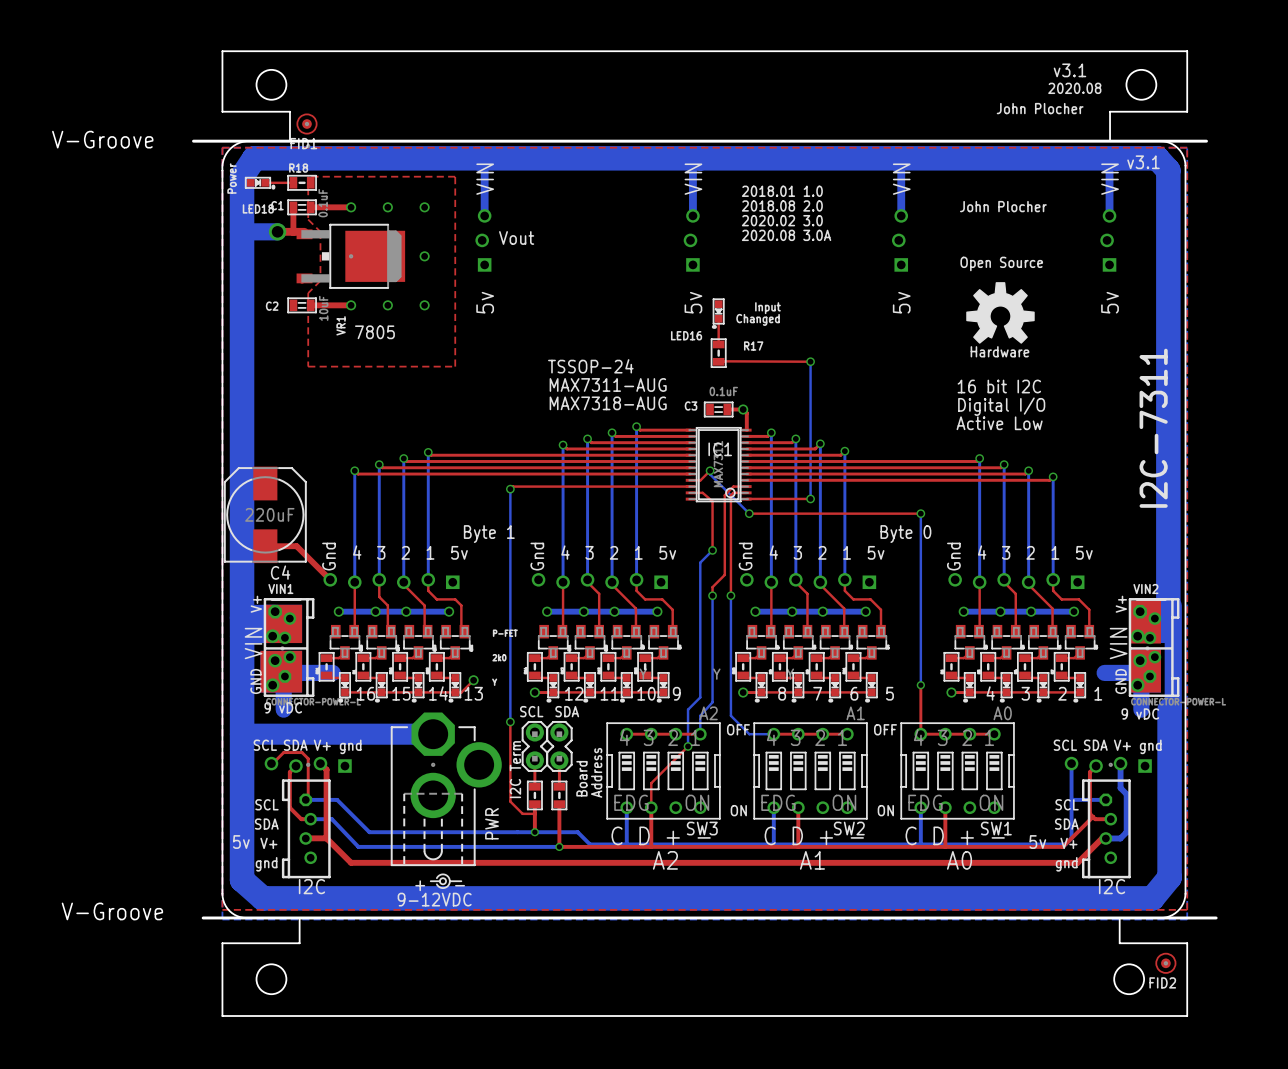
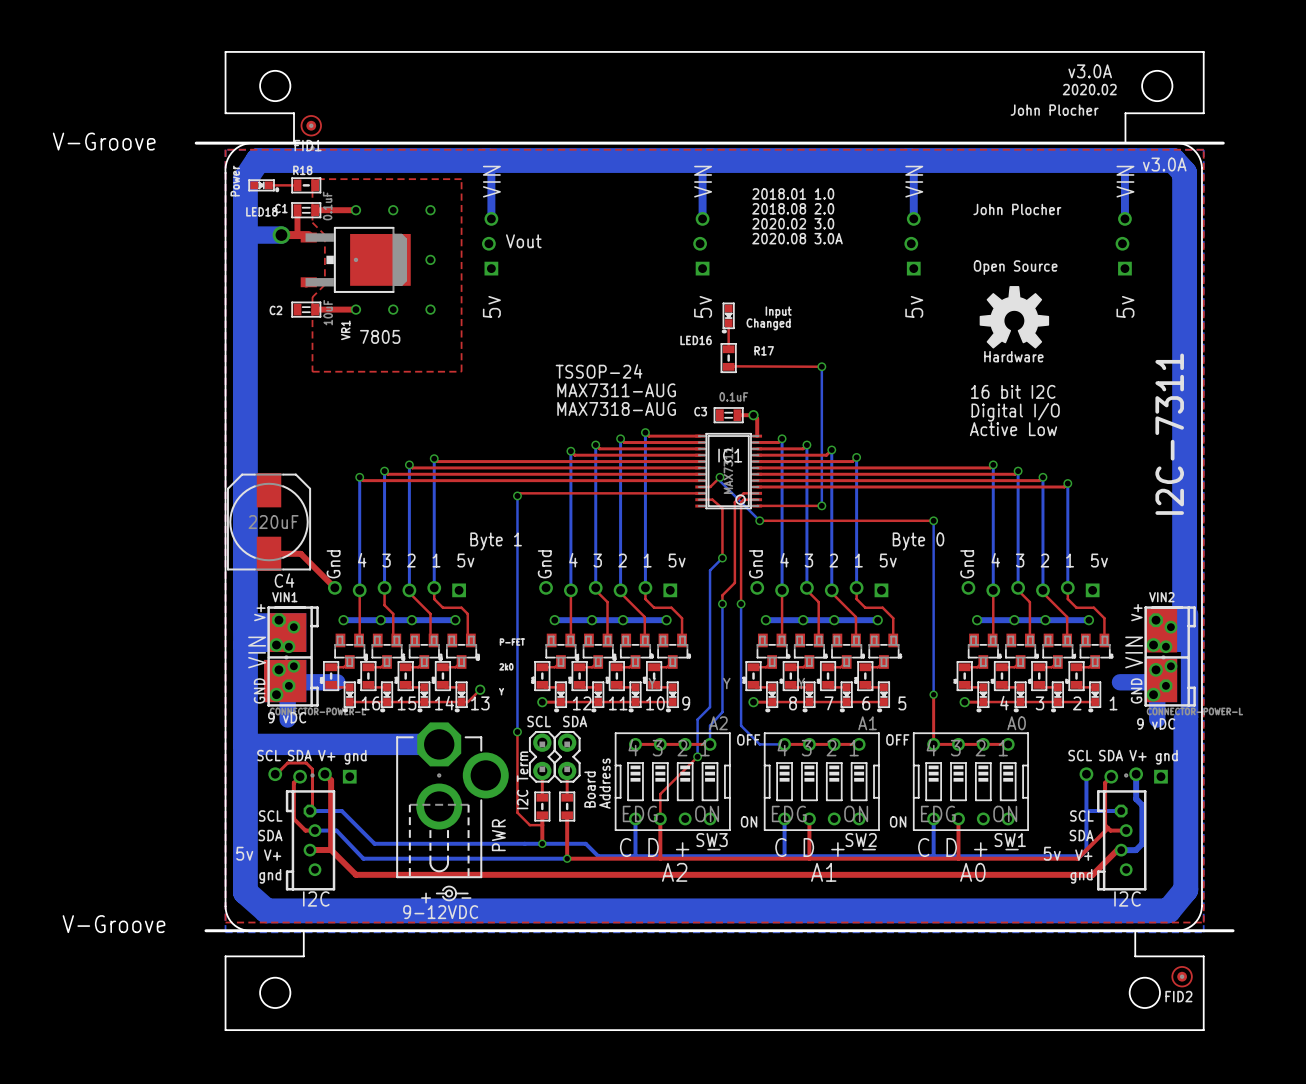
text: v3.1 (1069, 70) -> v3.0A (1090, 71)
text: 2020.08 (1074, 88) -> 2020.02 (1089, 89)
text: v3.1 (1143, 162) -> v3.0A (1164, 164)

